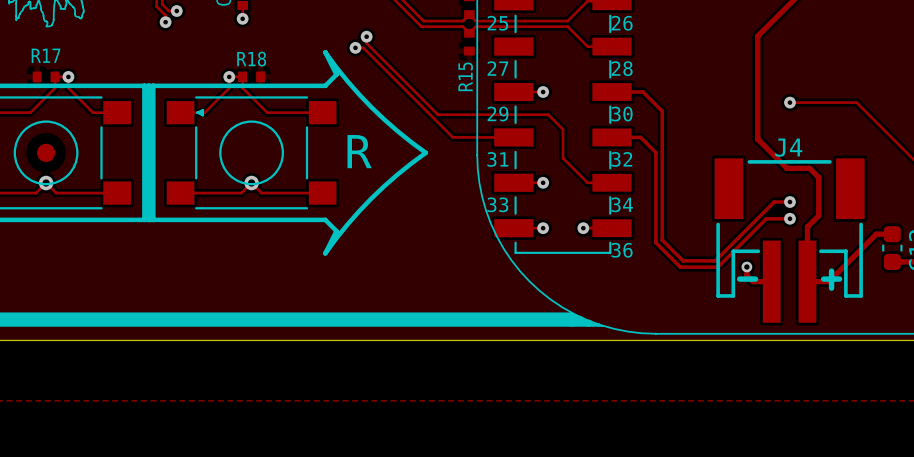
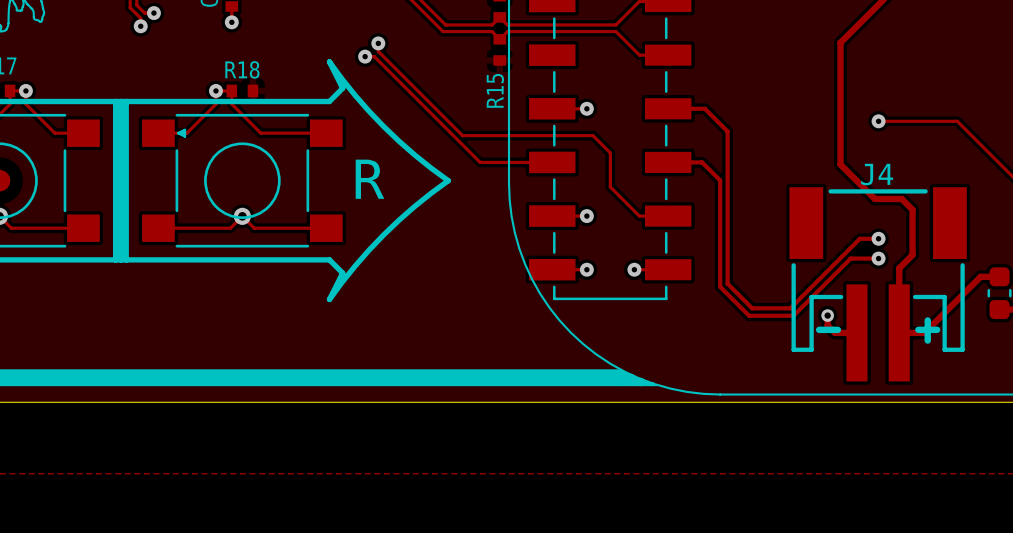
text: 25 (497, 23) -> none
text: 26 (622, 23) -> none
text: 27 (497, 68) -> none
text: 28 (622, 68) -> none
text: 29 (498, 114) -> none
text: 30 (622, 114) -> none
text: 31 (497, 159) -> none
text: 32 (621, 159) -> none
text: 33 (497, 204) -> none
text: 34 (622, 204) -> none
text: 36 (622, 250) -> none

